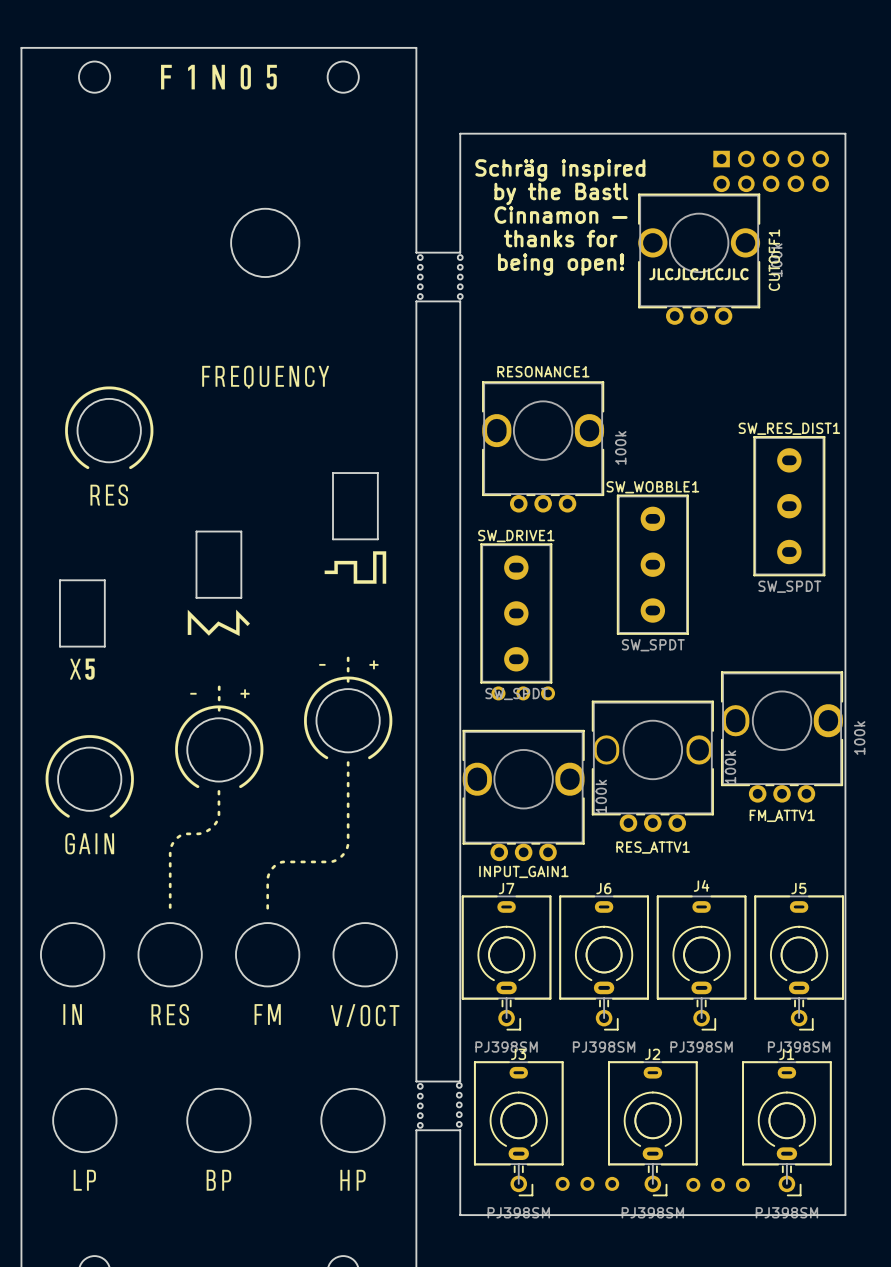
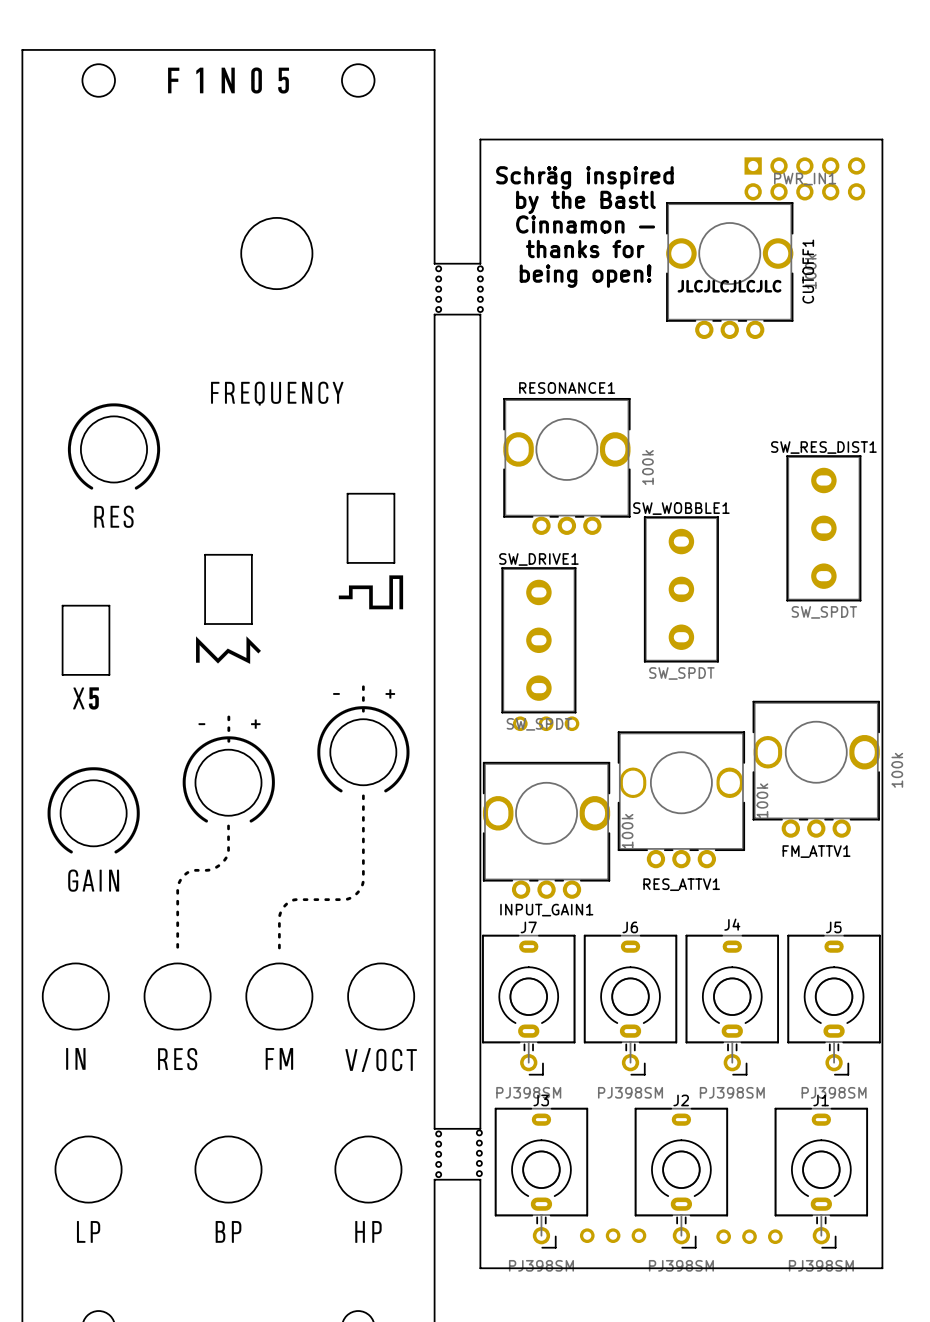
PWR_IN1 name: none -> PWR_IN1 (805, 179)

